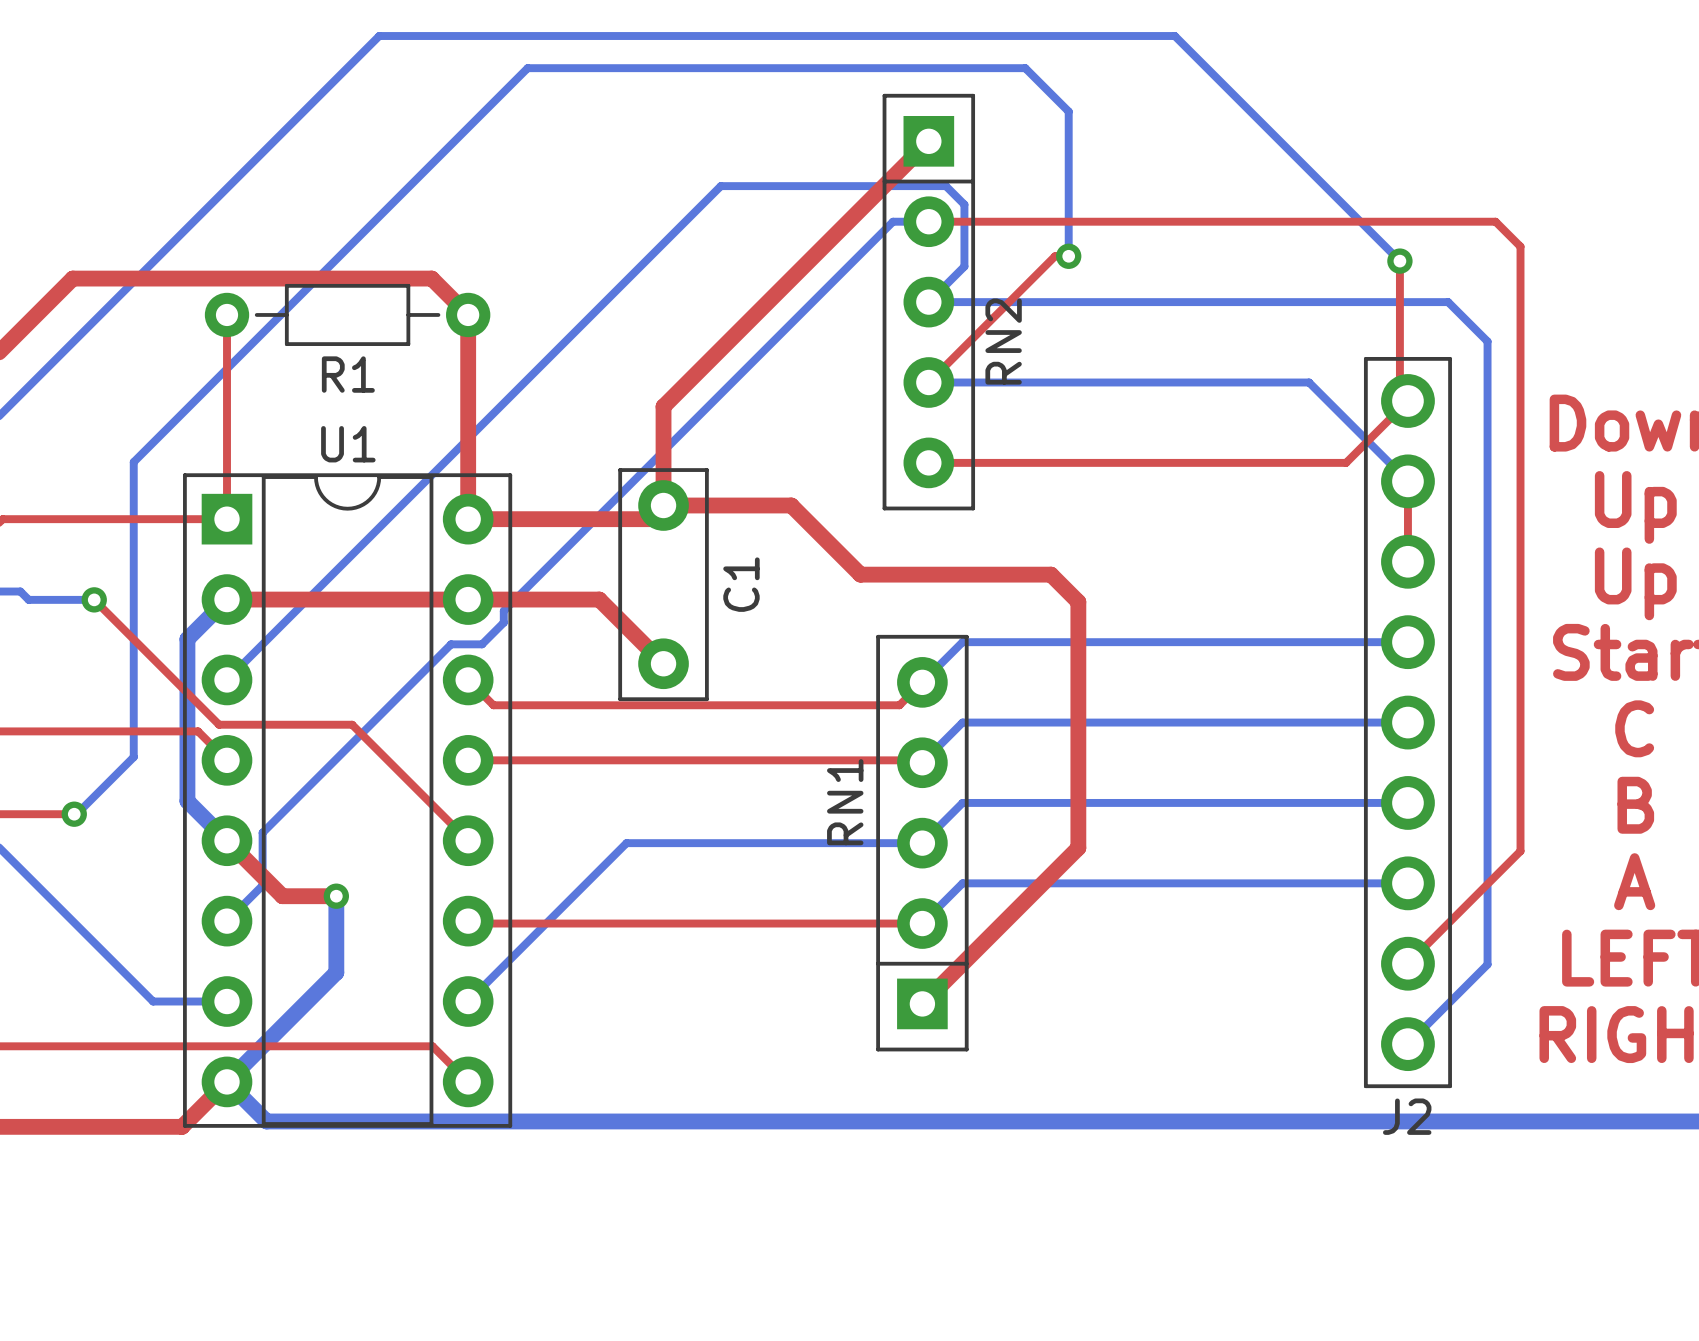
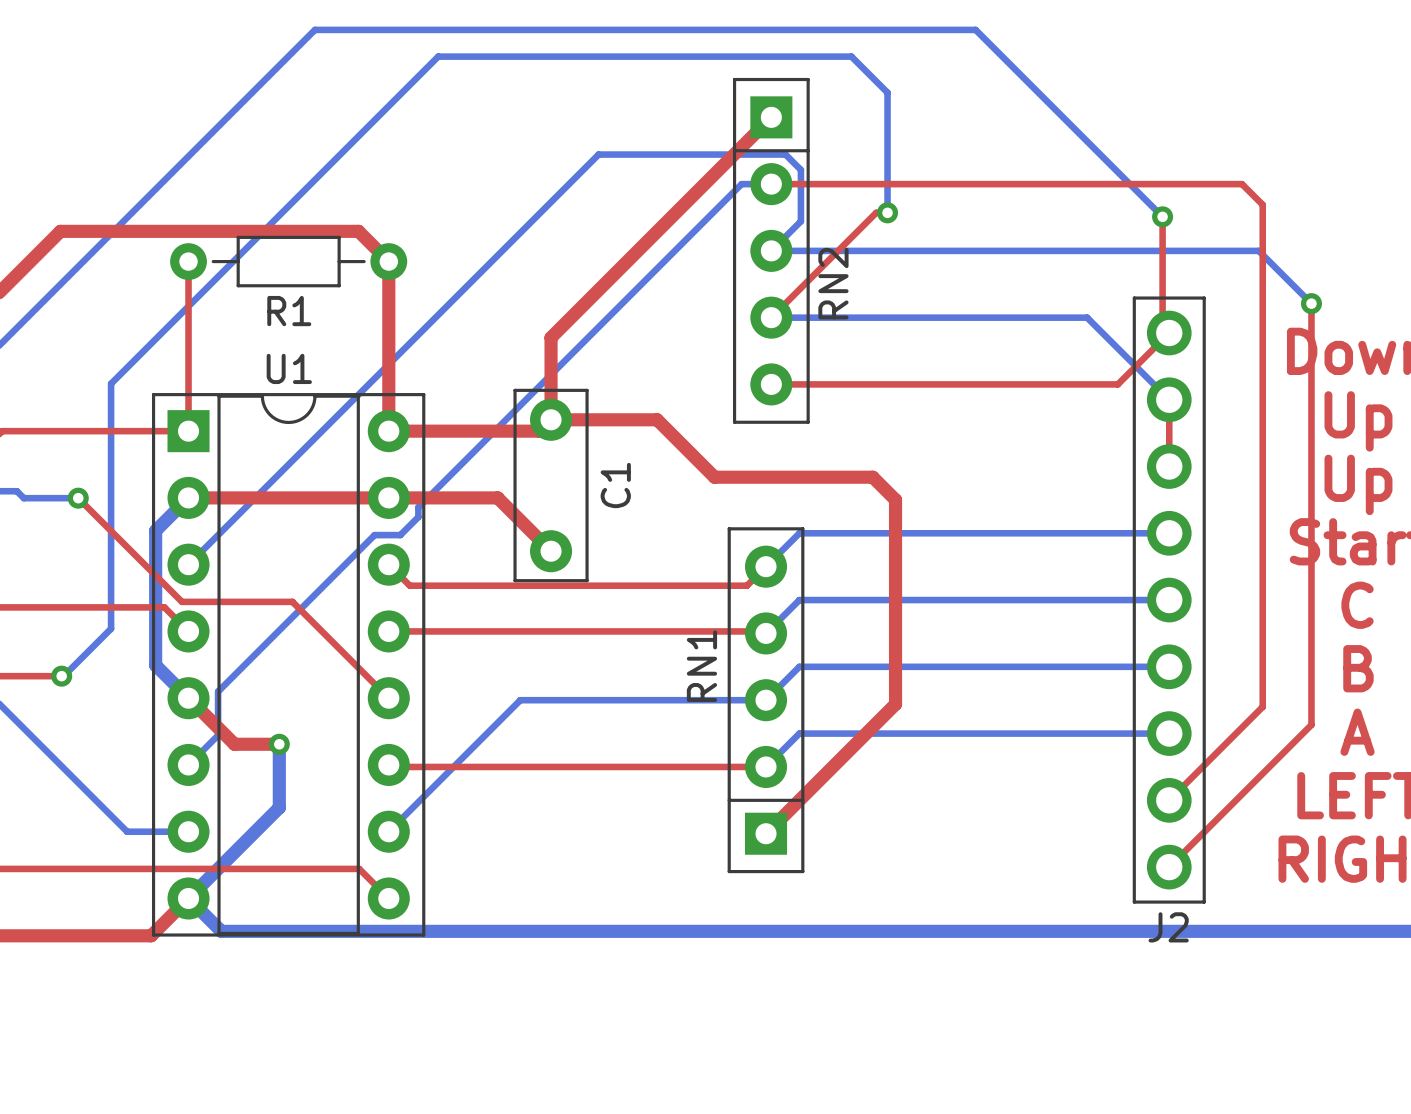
bottom track: (1448, 302) (1487, 341) (1487, 964) (1407, 1044) -> (1202, 250) (1258, 250) (1311, 303)
top track: none -> (1311, 303) (1311, 724) (1169, 867)
via: none -> (1311, 303)

